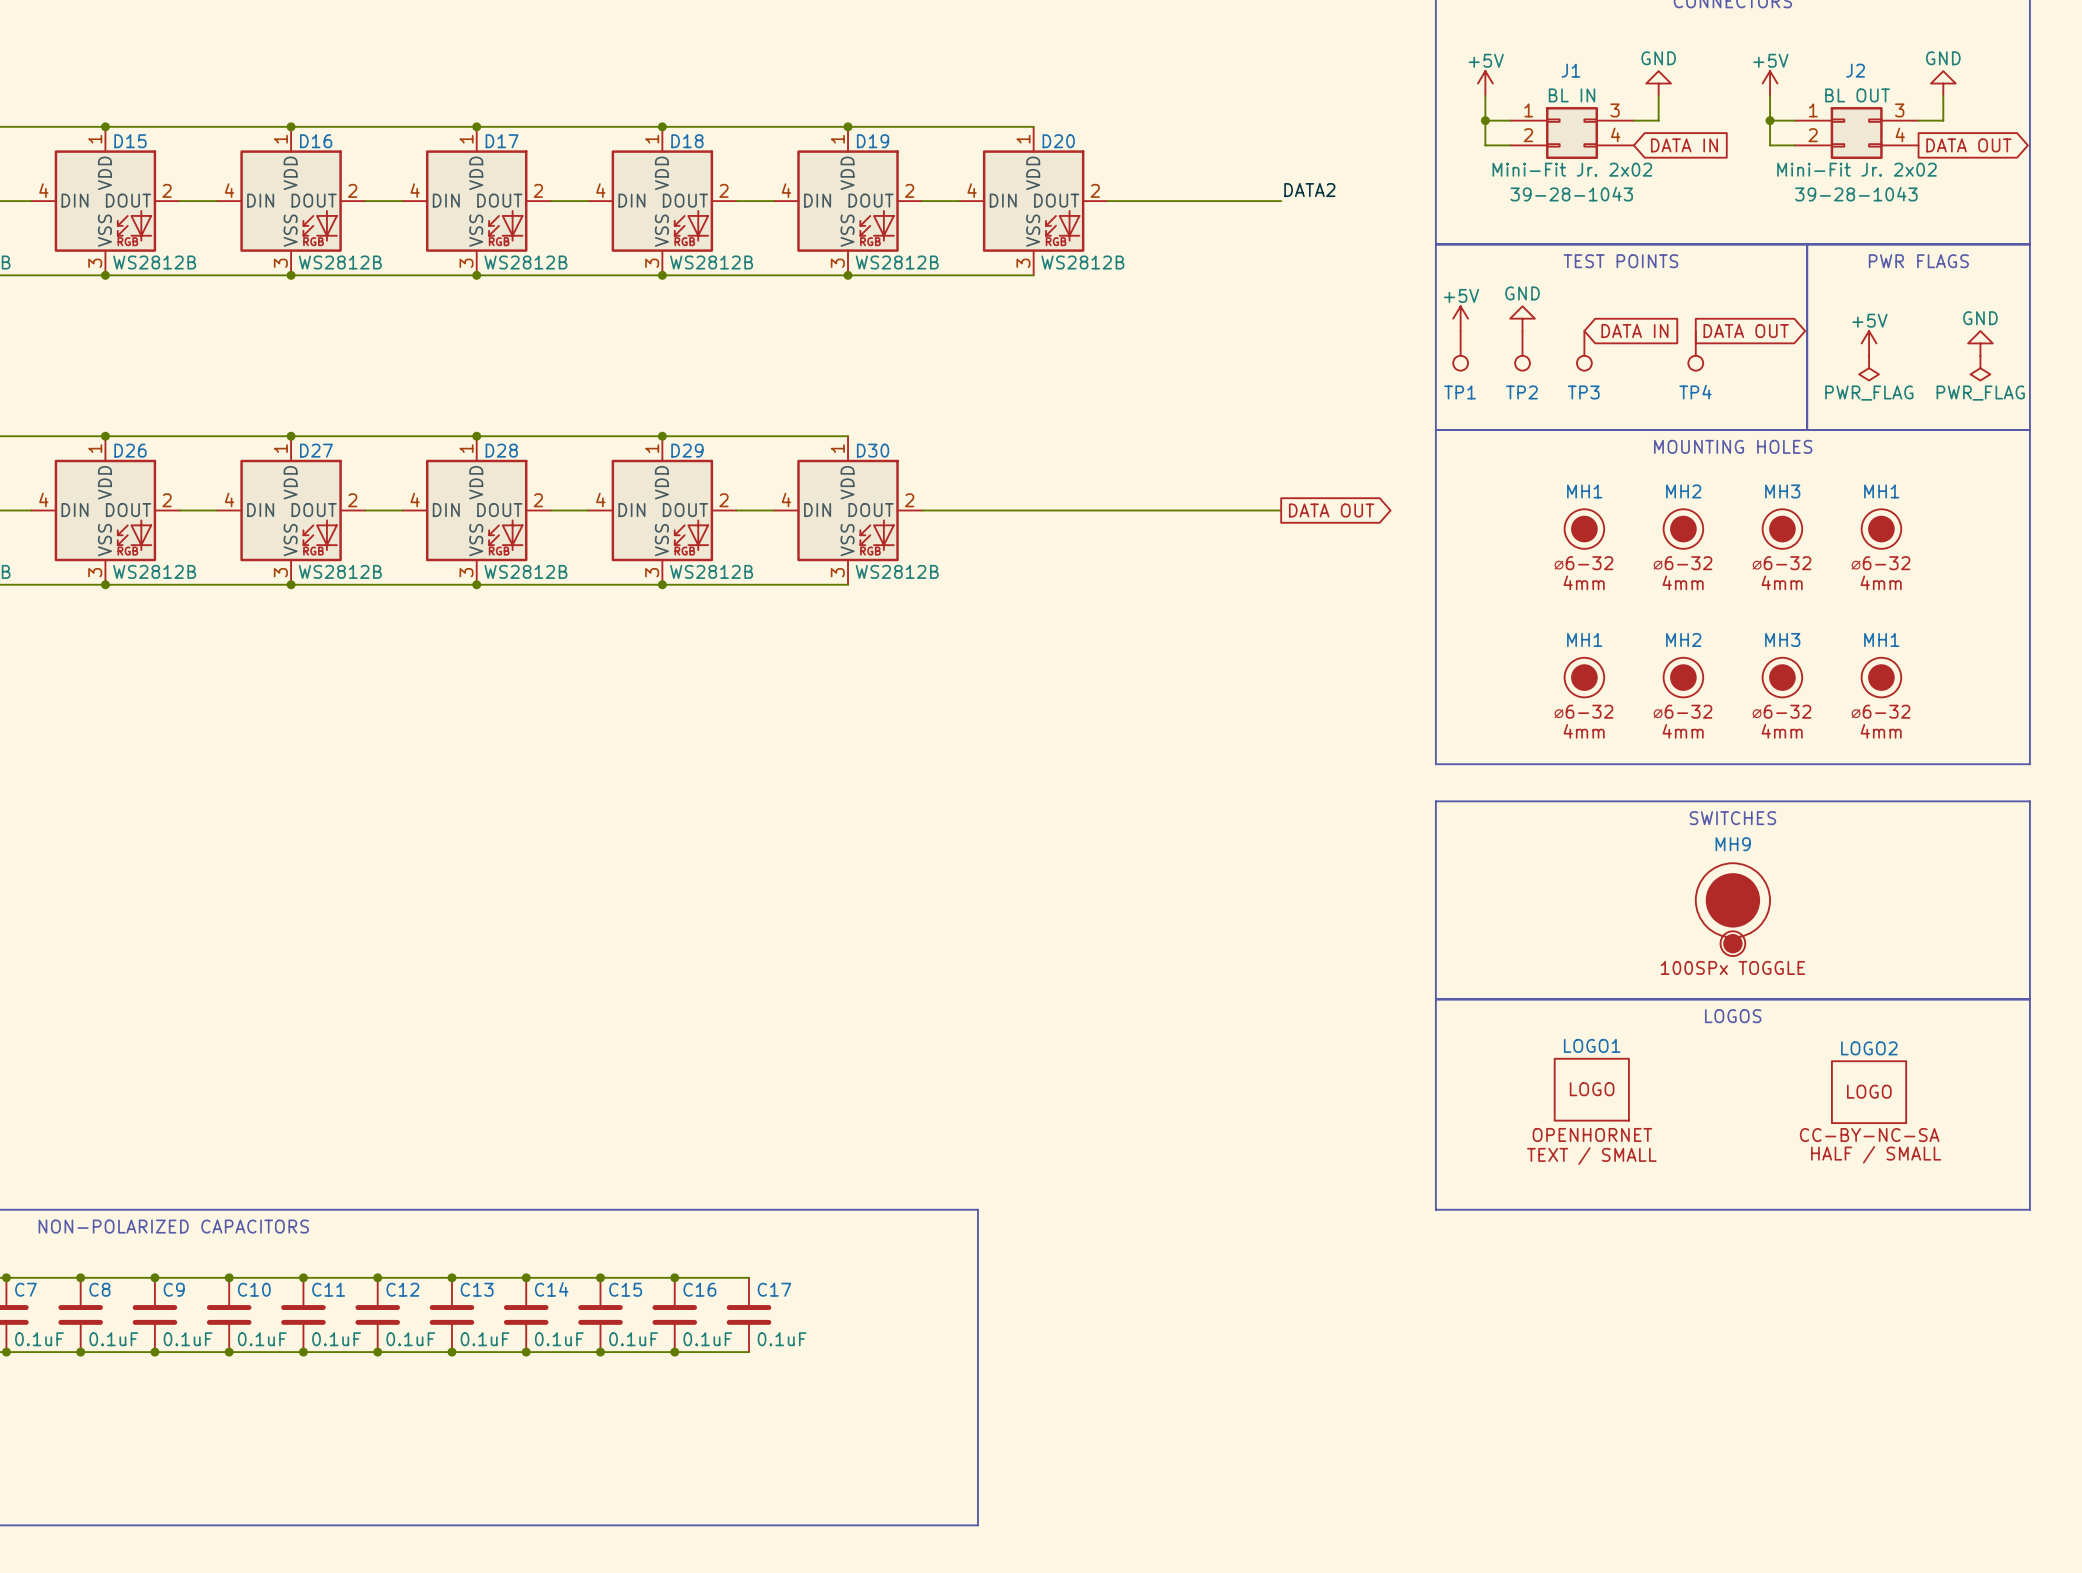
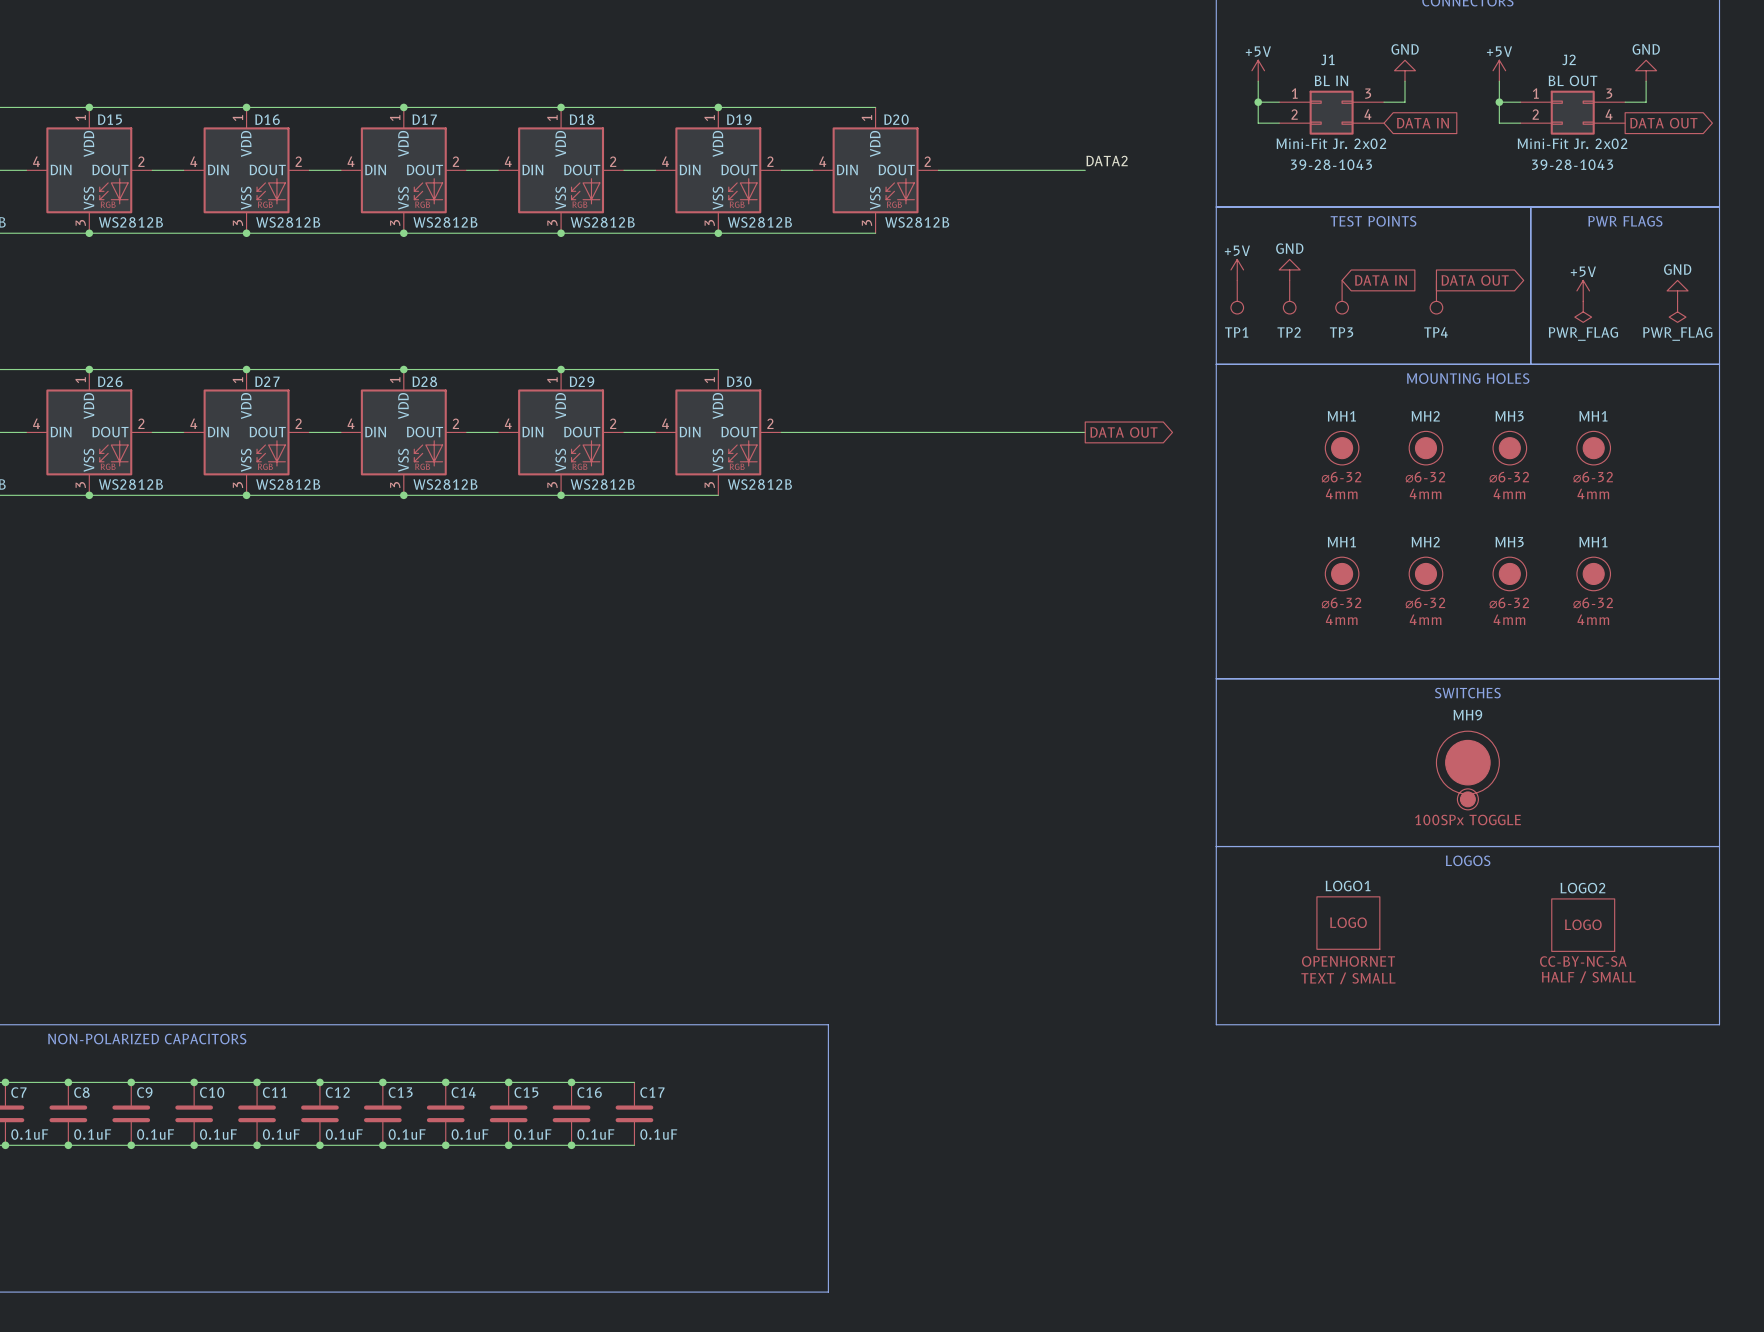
line: (1435, 764) (2029, 764) -> (1216, 647) (1216, 678) (1719, 678) (1719, 647)

